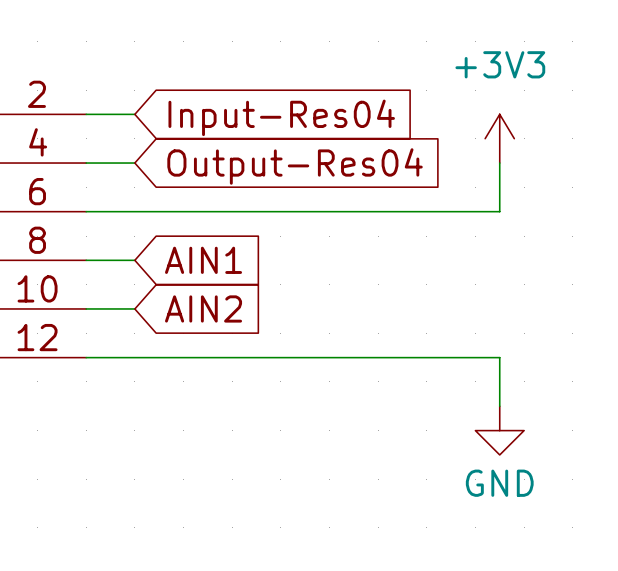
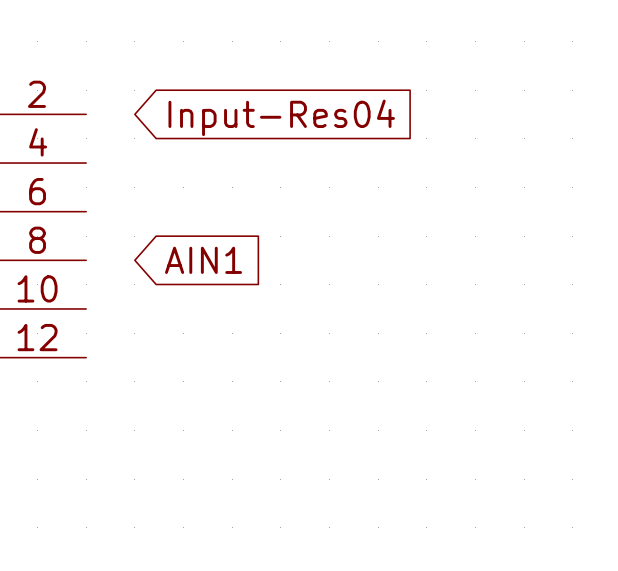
wire: (86, 114) (134, 114) -> none
power symbol: +3V3 (499, 138) -> none
wire: (86, 163) (134, 163) -> none
wire: (499, 163) (499, 211) (86, 211) -> none
global label: Output-Res04 (295, 166) -> none
wire: (86, 260) (134, 260) -> none
wire: (86, 308) (134, 308) -> none
global label: AIN2 (203, 308) -> none
wire: (86, 357) (499, 357) (499, 406) -> none
power symbol: GND (499, 430) -> none

